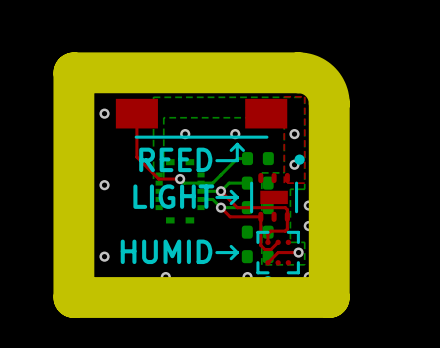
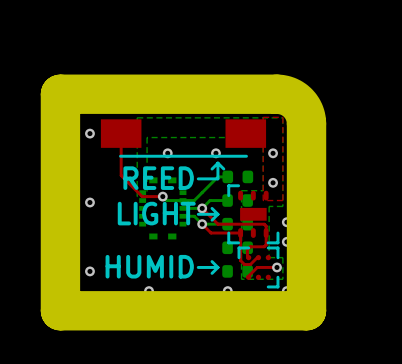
part footprint: [250, 154, 305, 222] -> [227, 184, 280, 245]
part footprint: [256, 230, 300, 287] -> [237, 246, 280, 289]

